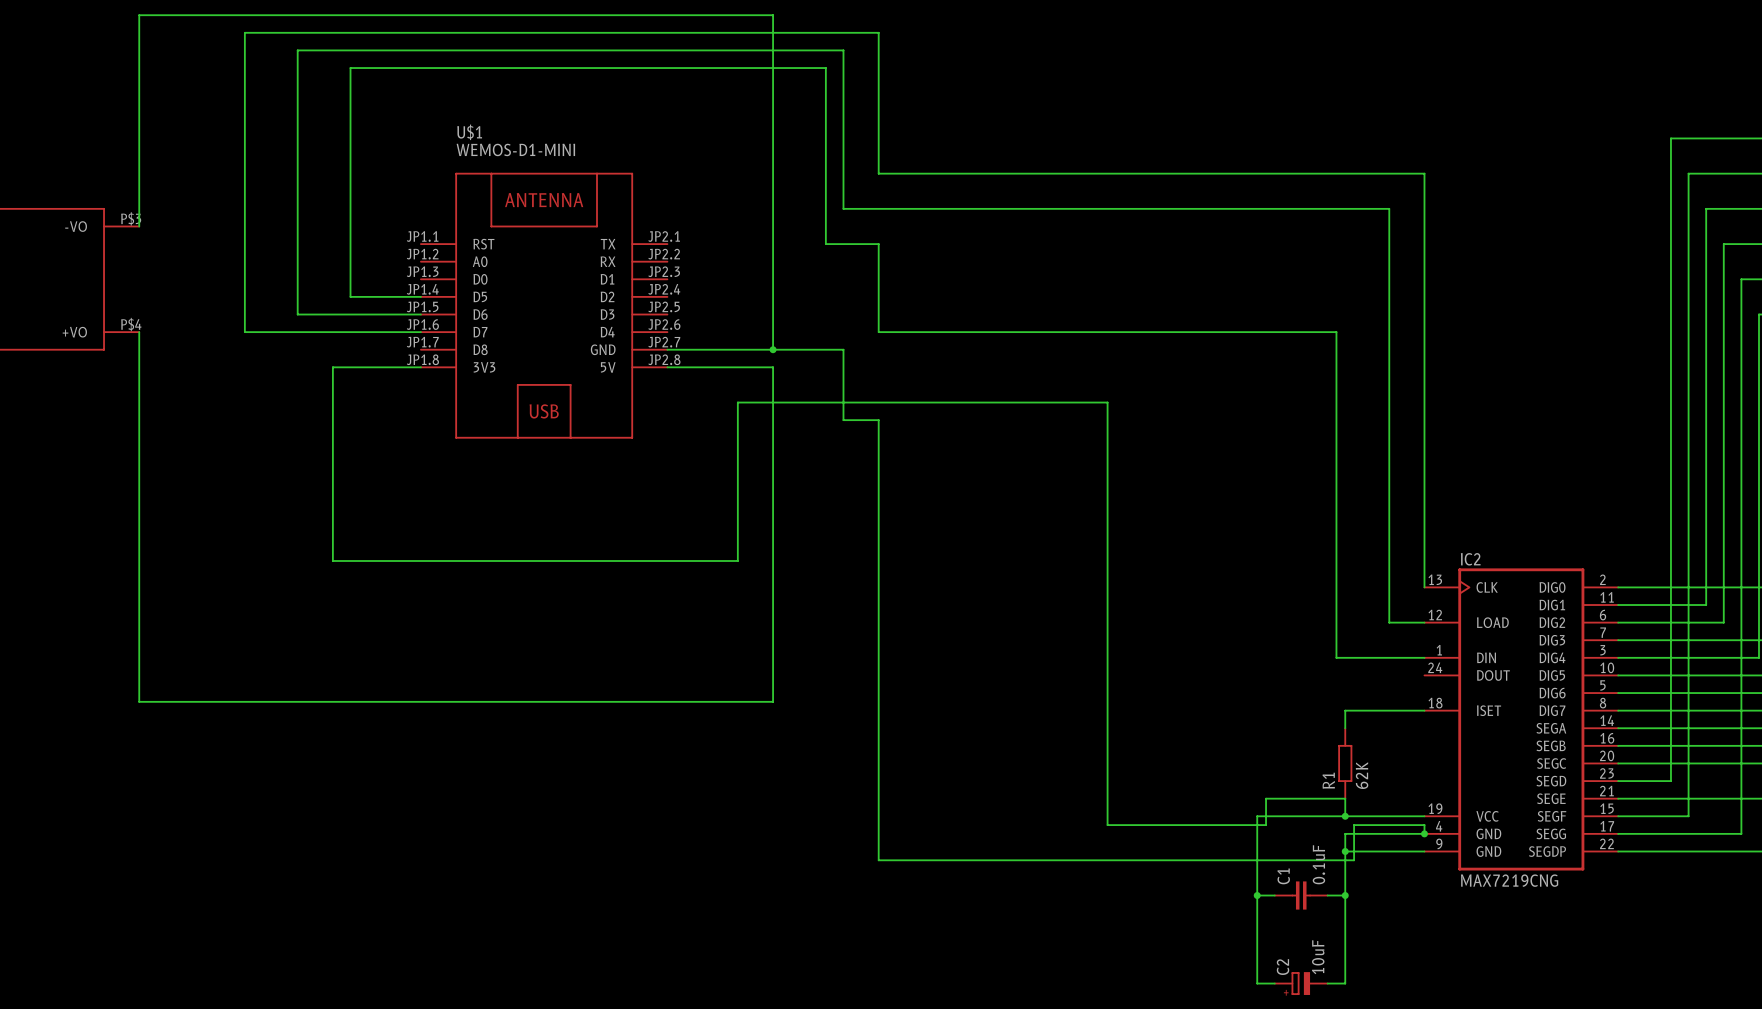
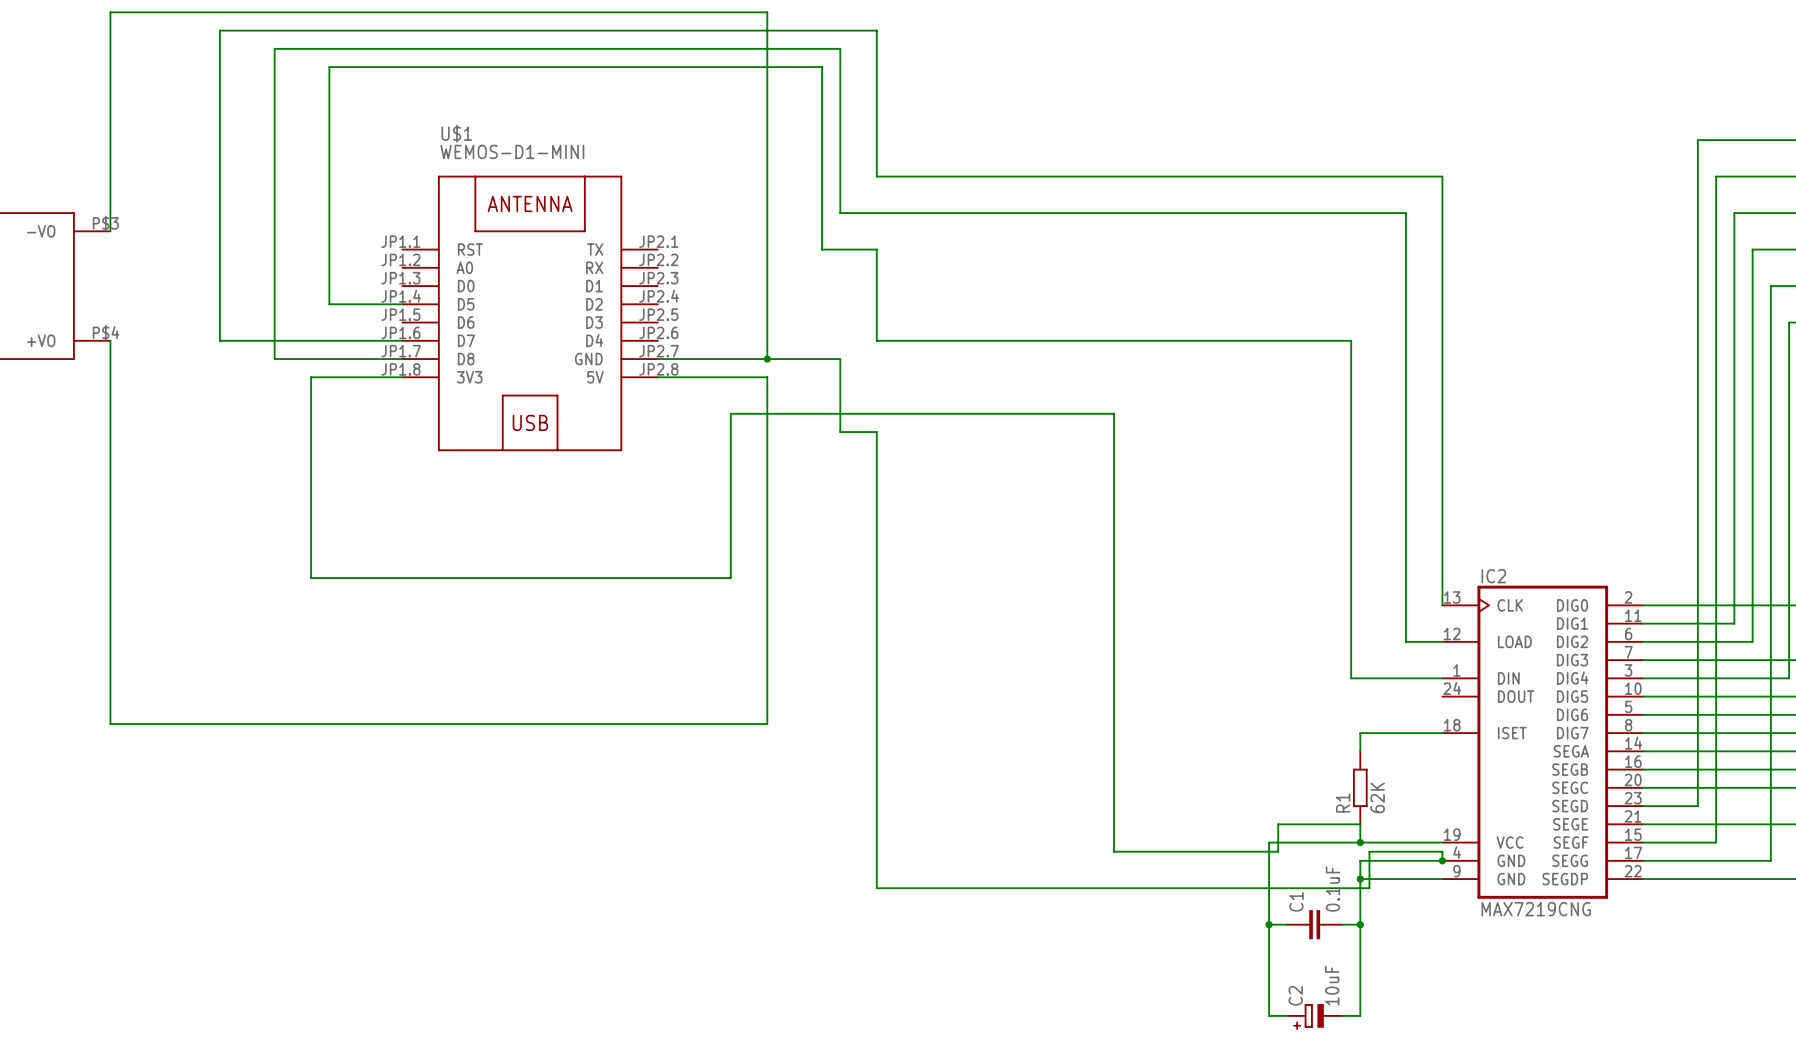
wire: (297, 314) (420, 314) -> (274, 322) (274, 359) (402, 359)

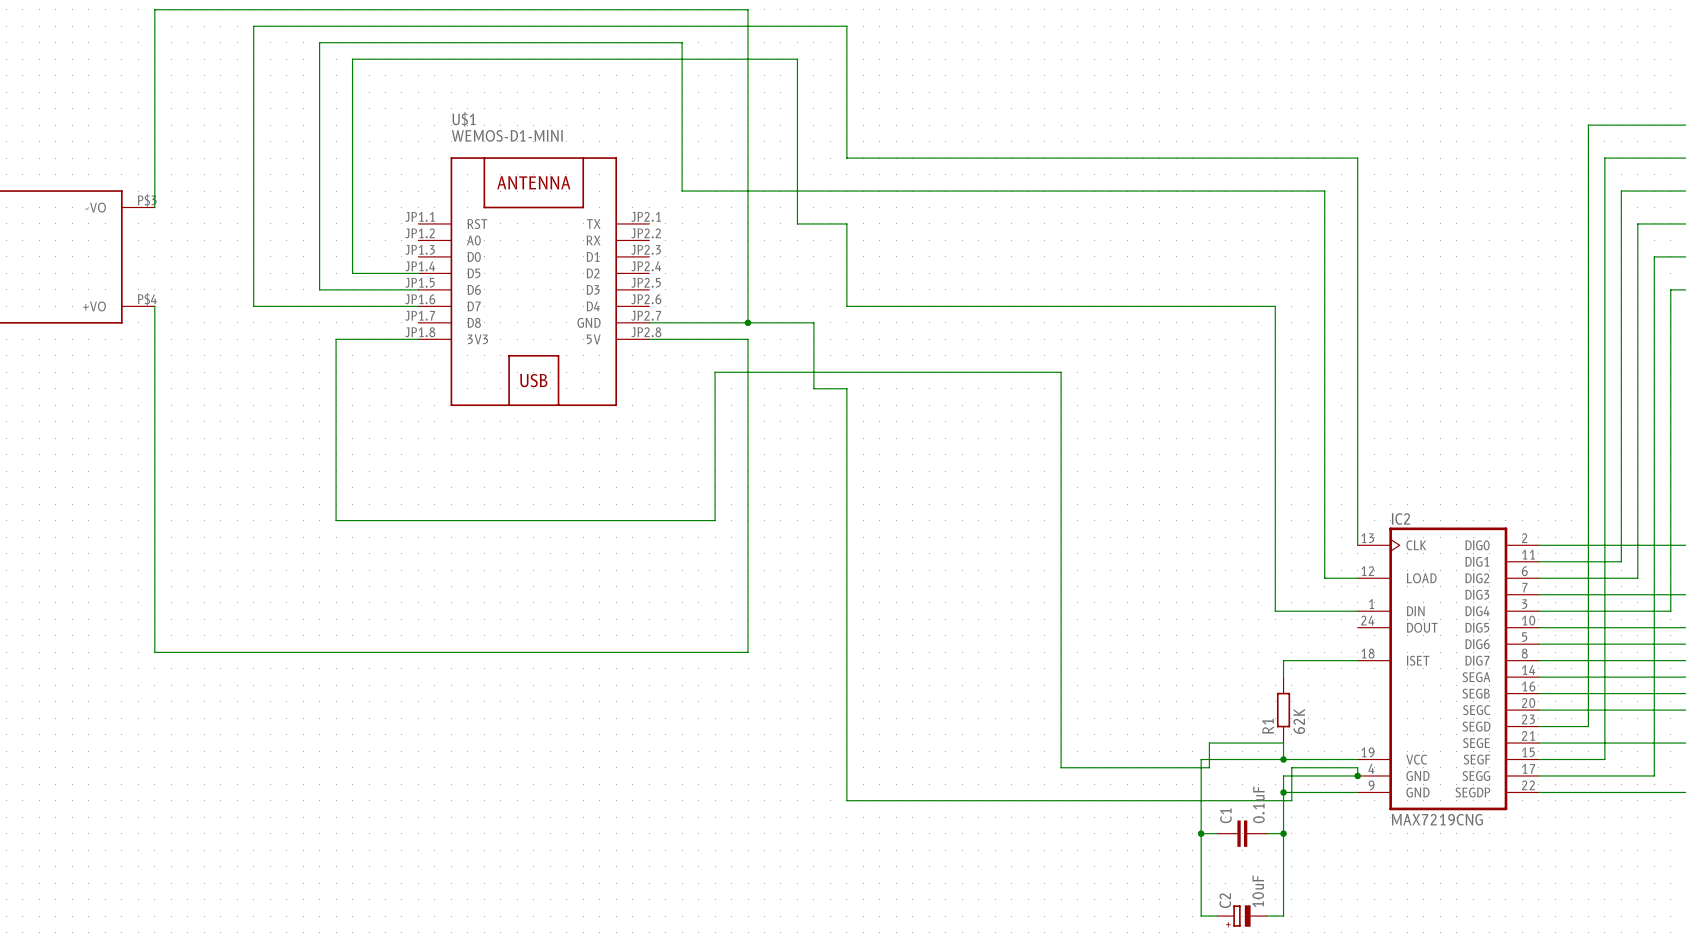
wire: (292, 48) (274, 48) (274, 359) (402, 359) -> (319, 42) (319, 289) (418, 289)
wire: (694, 48) (840, 48) (840, 213) -> (682, 42) (682, 191) (813, 191)

